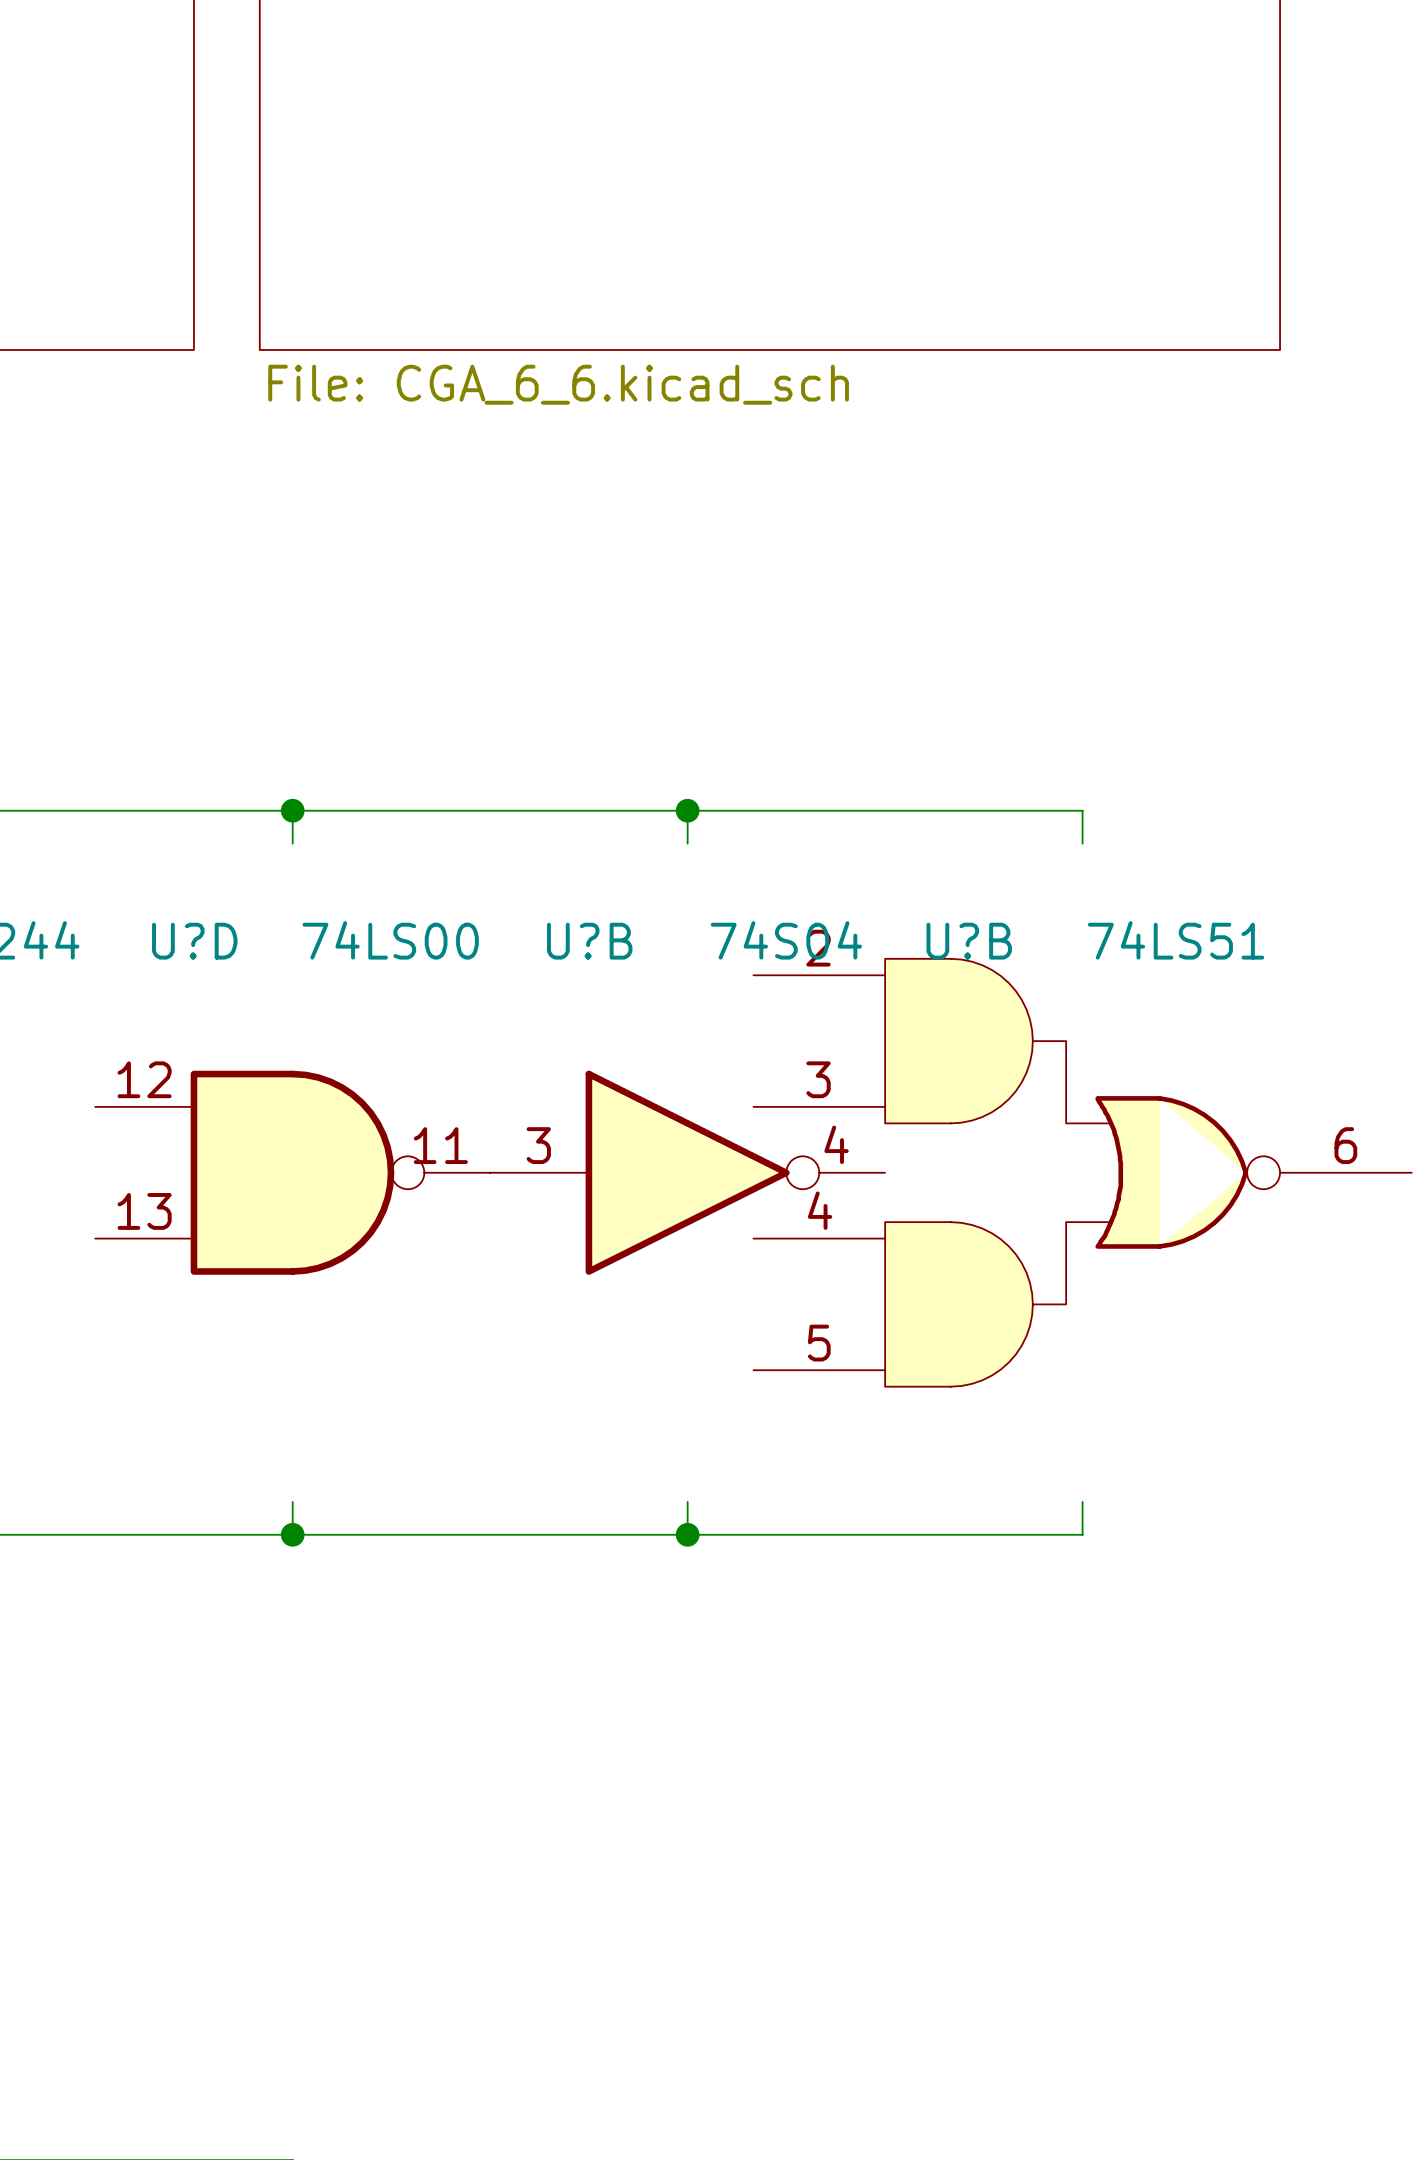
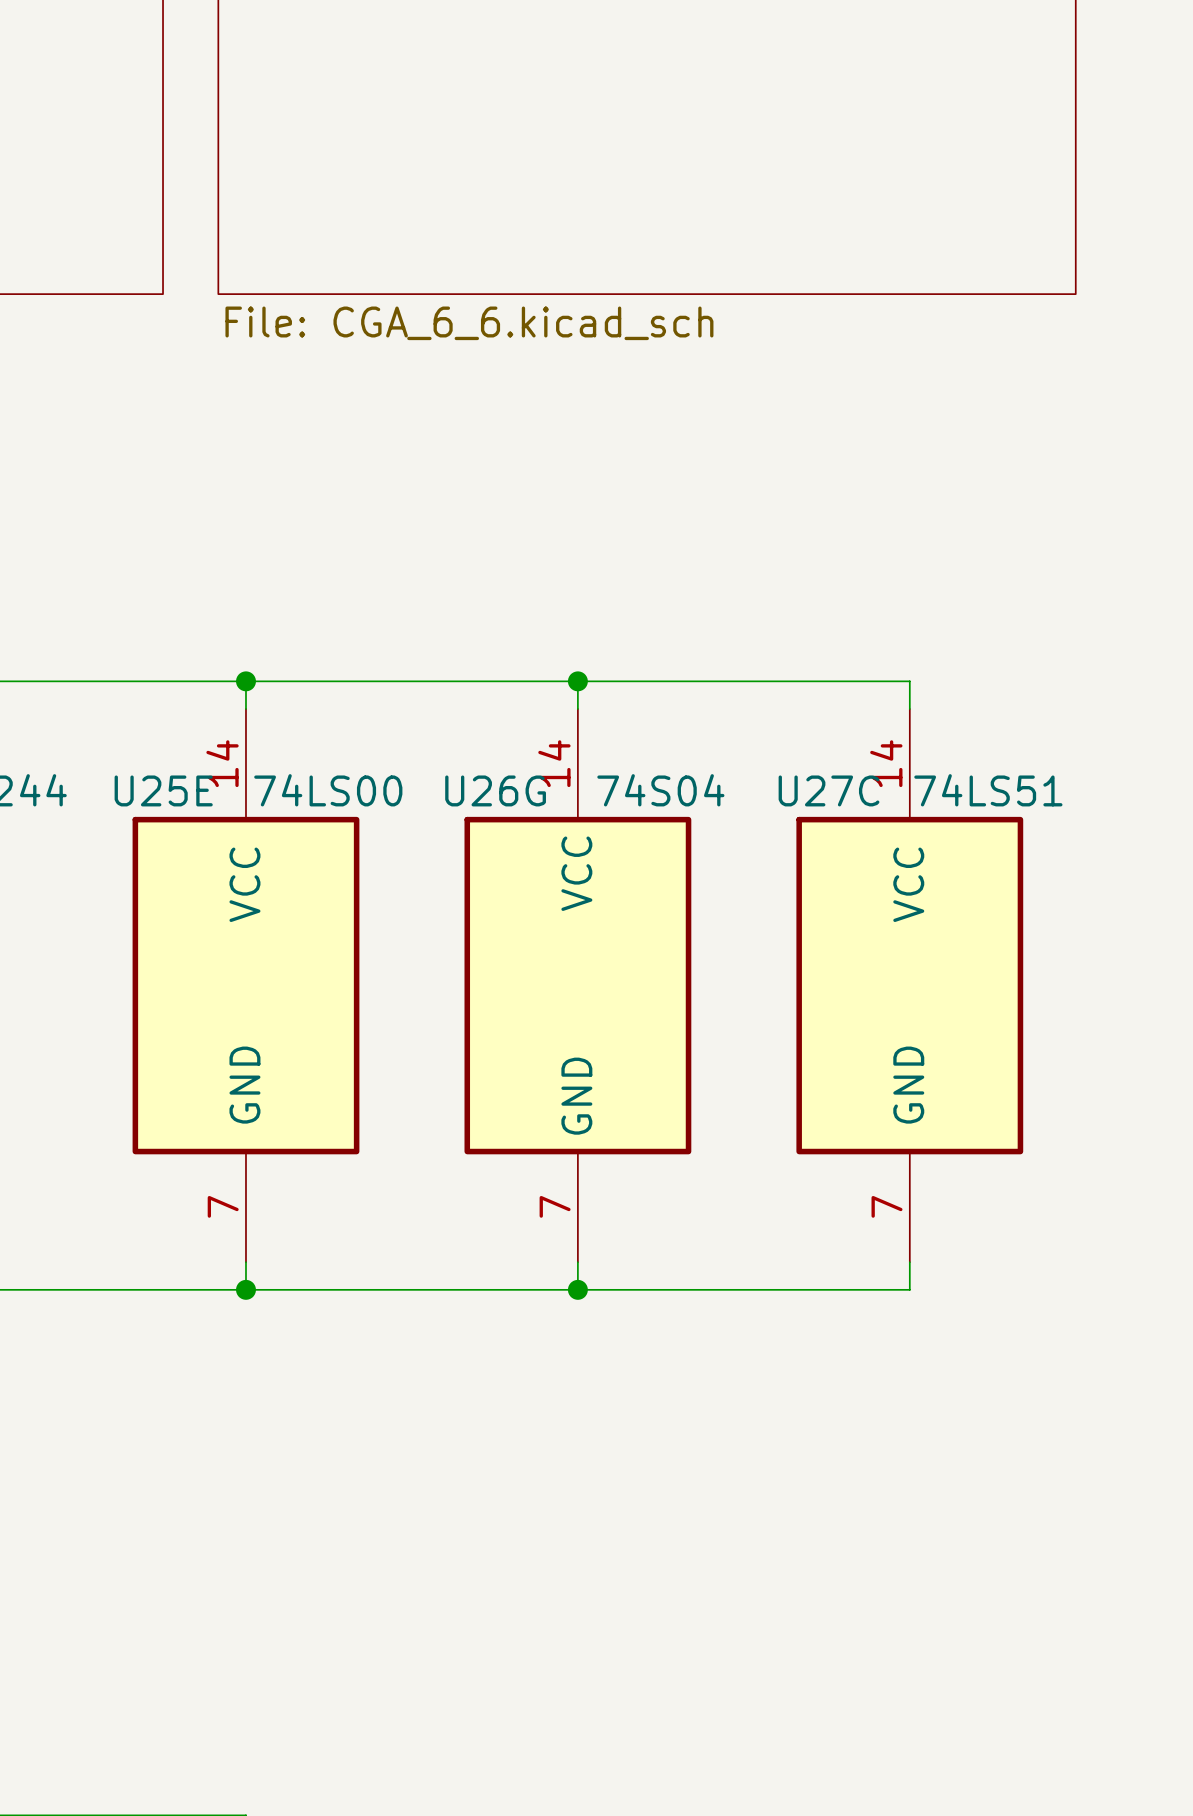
U?D: 74LS00 (292, 1172) -> none
U25E: none -> 74LS00 (245, 985)
U?B: 74S04 (687, 1172) -> none
U26G: none -> 74S04 (577, 985)
U?B: 74LS51 (1082, 1172) -> none
U27C: none -> 74LS51 (909, 985)

